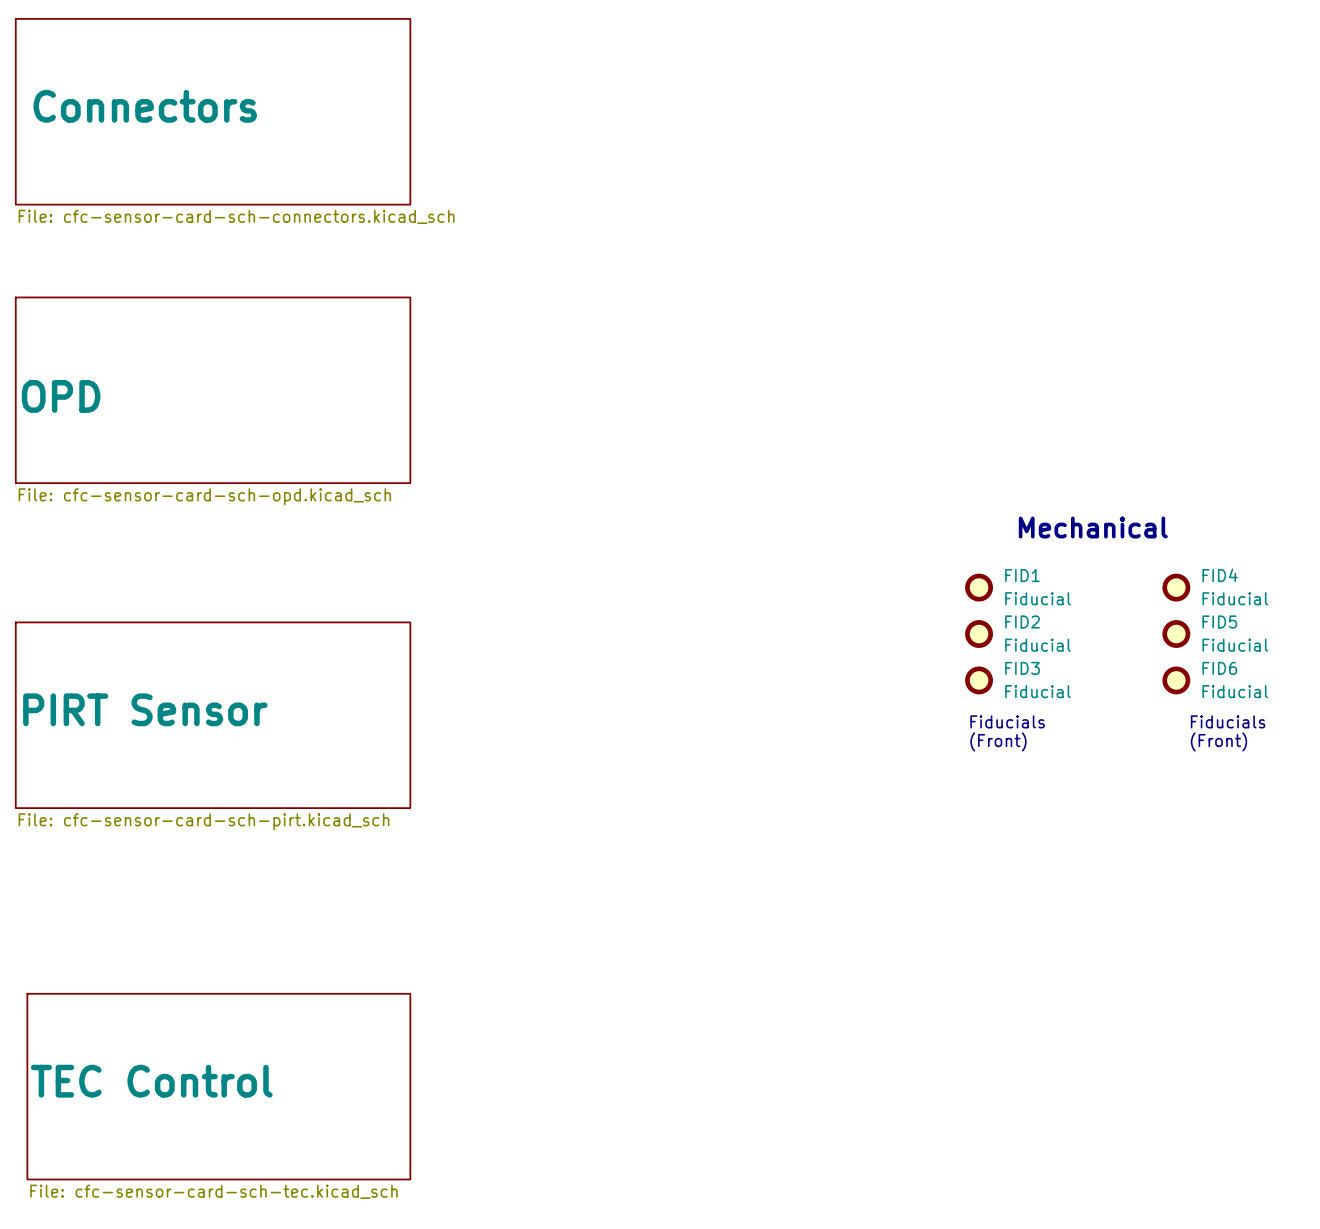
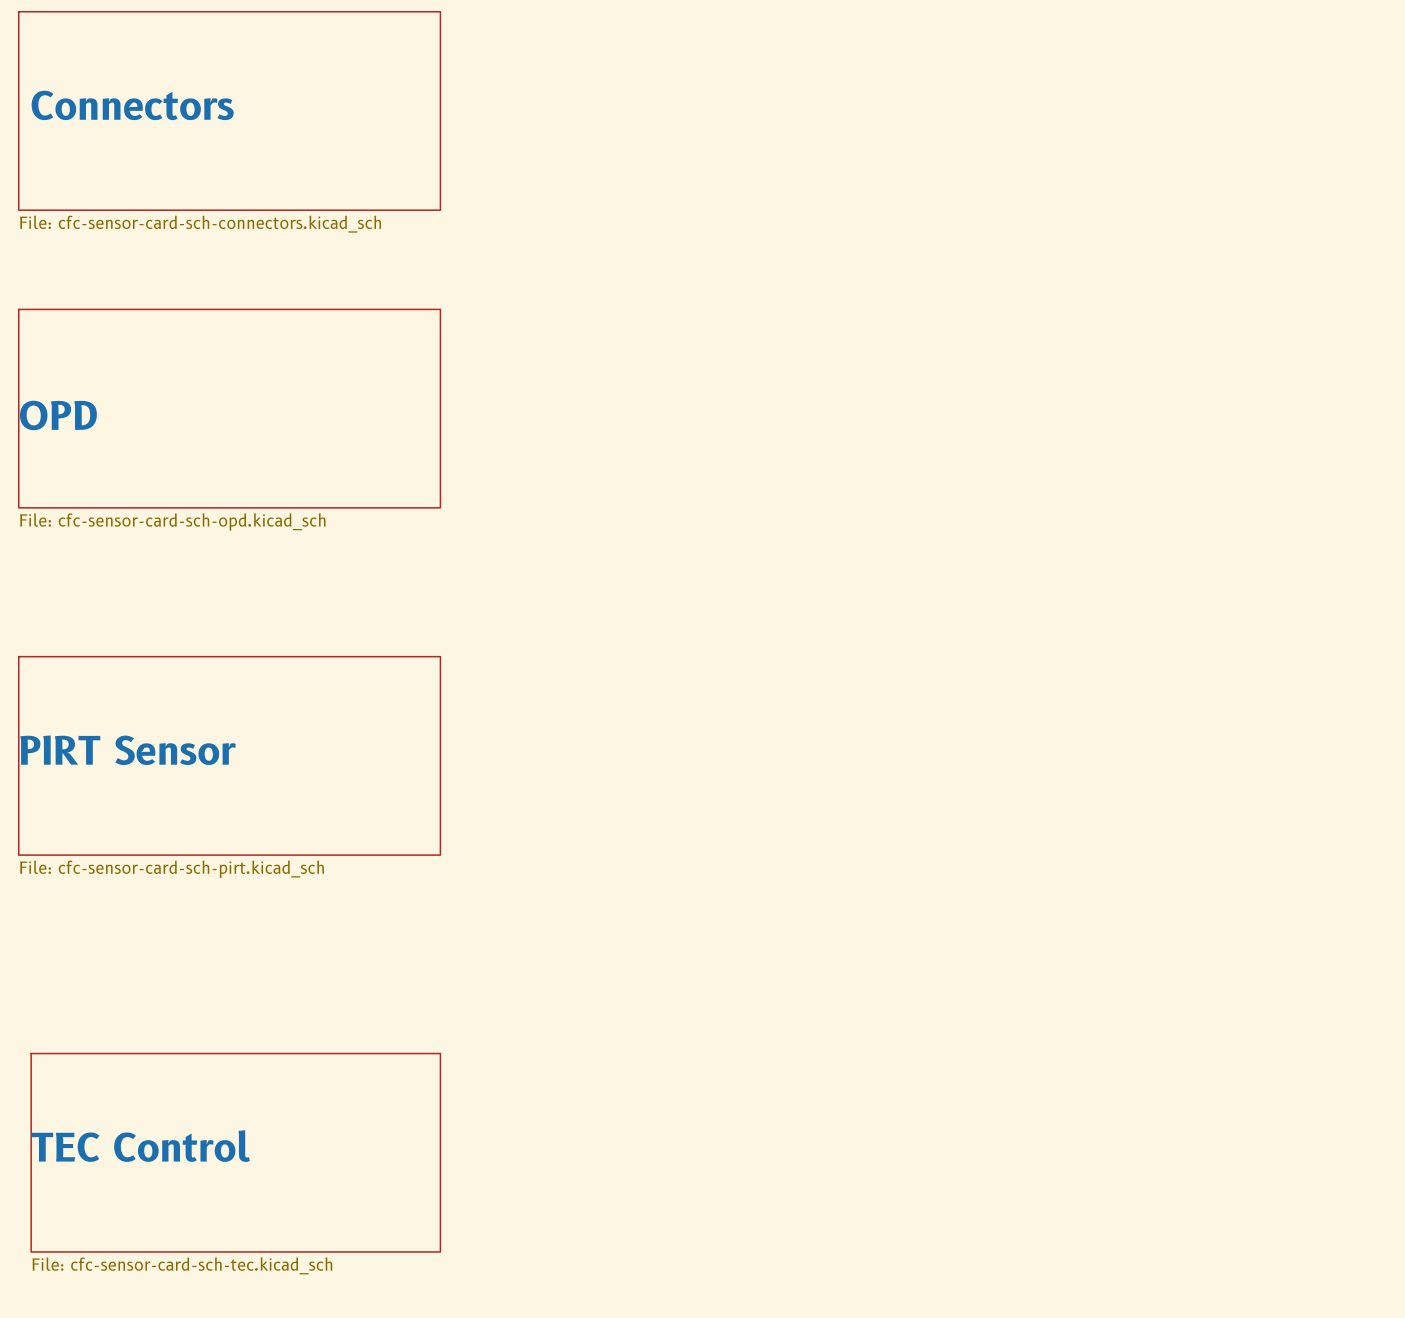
text: Mechanical (1093, 527) -> none
FID1: Fiducial (979, 587) -> none
FID4: Fiducial (1176, 587) -> none
FID2: Fiducial (979, 634) -> none
FID5: Fiducial (1176, 634) -> none
FID3: Fiducial (979, 680) -> none
FID6: Fiducial (1176, 680) -> none
text: Fiducials (1007, 721) -> none
text: Fiducials (1228, 721) -> none
text: (Front) (998, 741) -> none
text: (Front) (1218, 741) -> none

